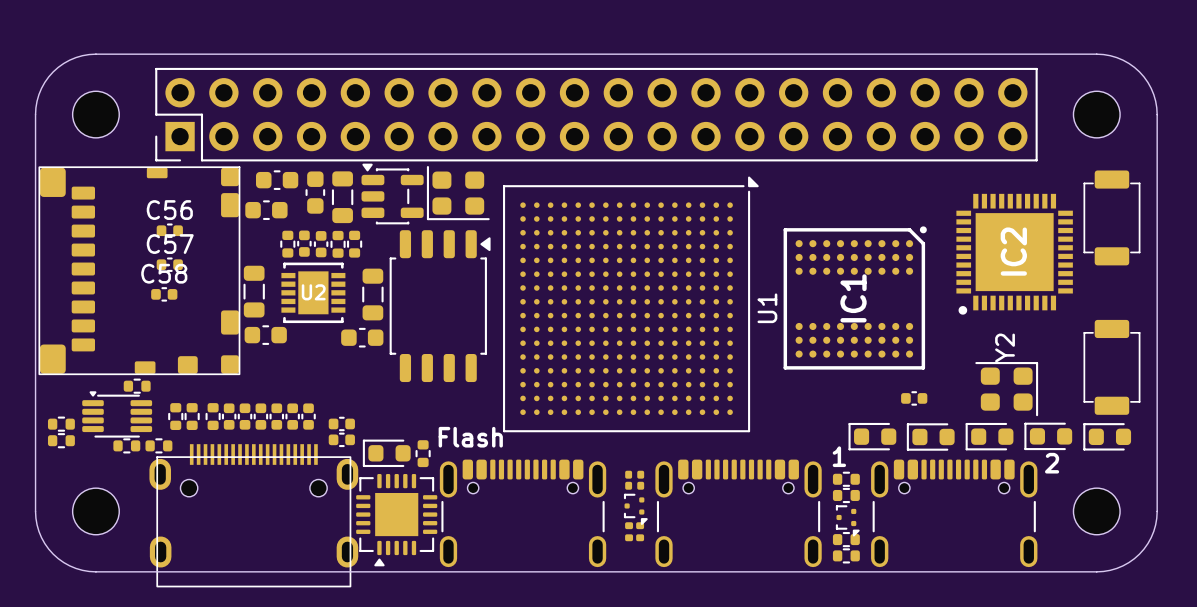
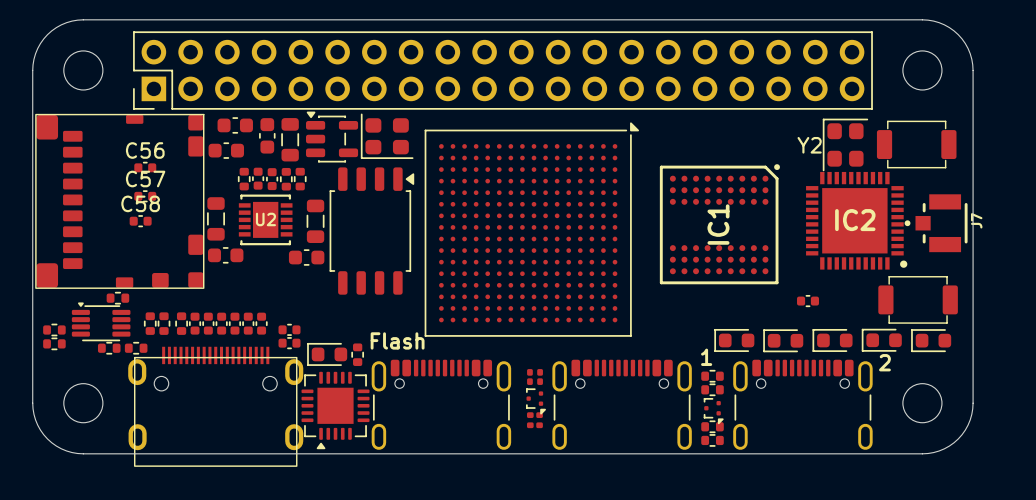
part rotation: 0° (1111, 217) -> 90° clockwise (916, 144)
IC2 rotation: 0° (1014, 254) -> 90° counterclockwise (856, 220)
J7: none -> (936, 223)
U1 name: U1 (767, 308) -> none
part rotation: 0° (1111, 367) -> 90° clockwise (918, 299)
Y2 rotation: 0° (1006, 389) -> 90° counterclockwise (845, 144)
Y2 position: (1006, 389) -> (845, 144)
part position: (914, 398) -> (808, 301)

